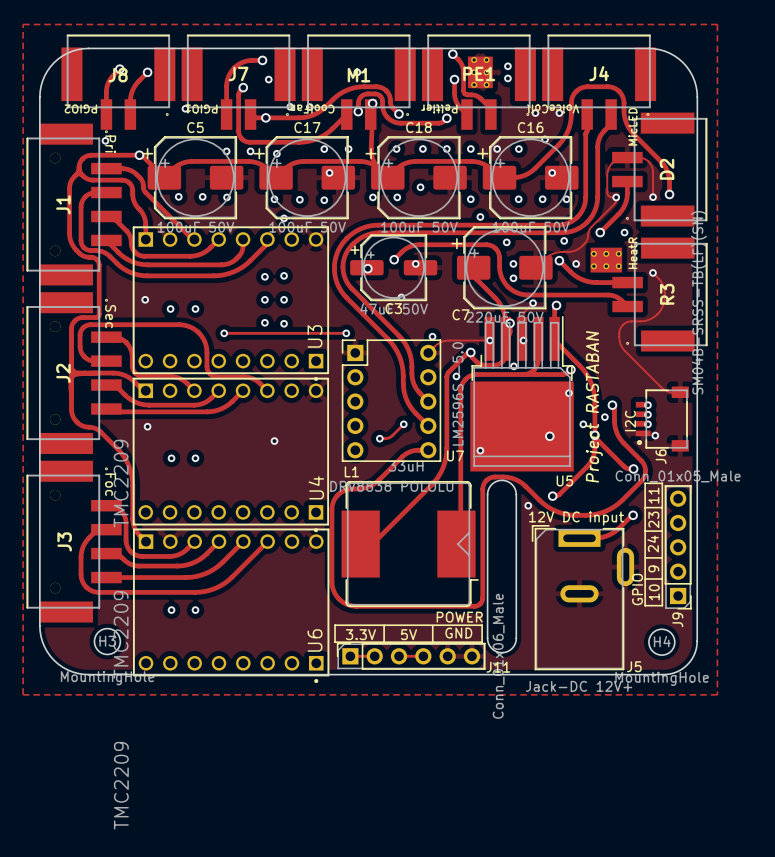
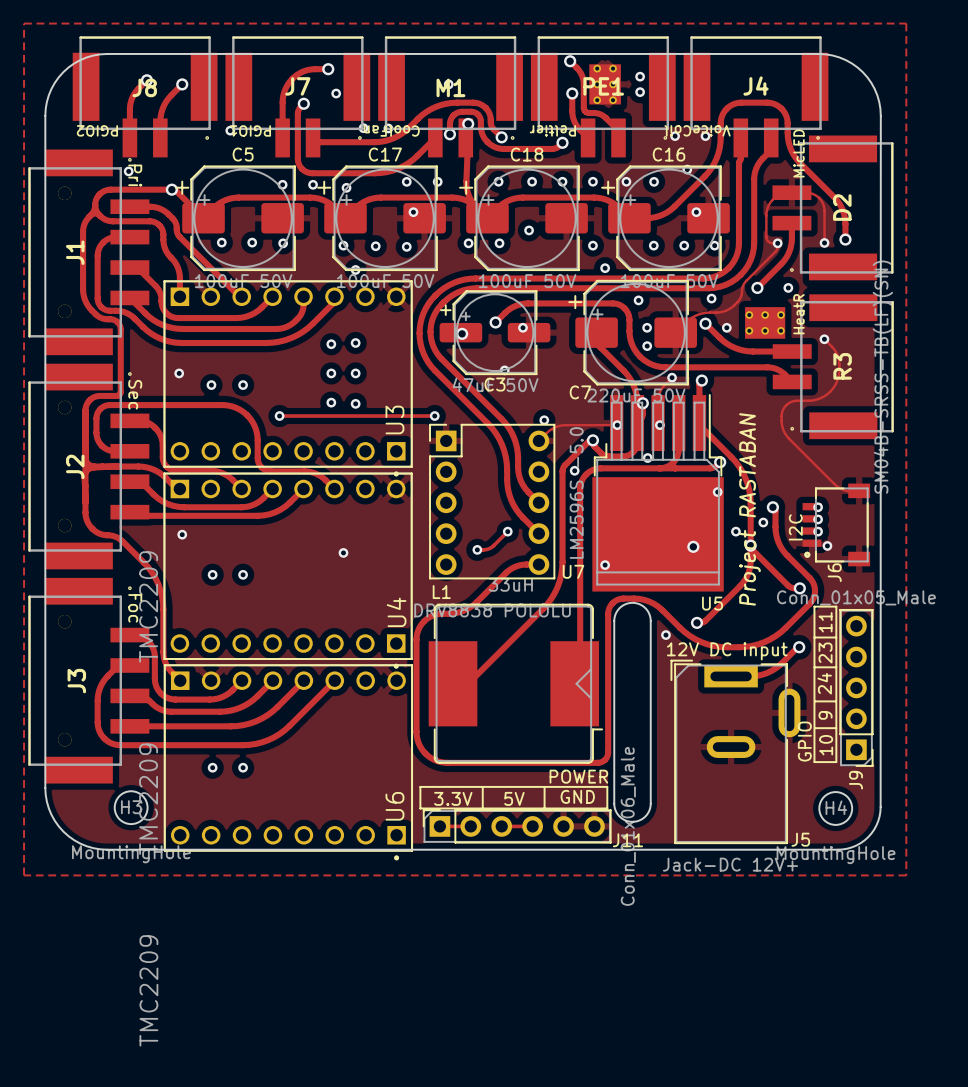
via: (265, 117) -> none

